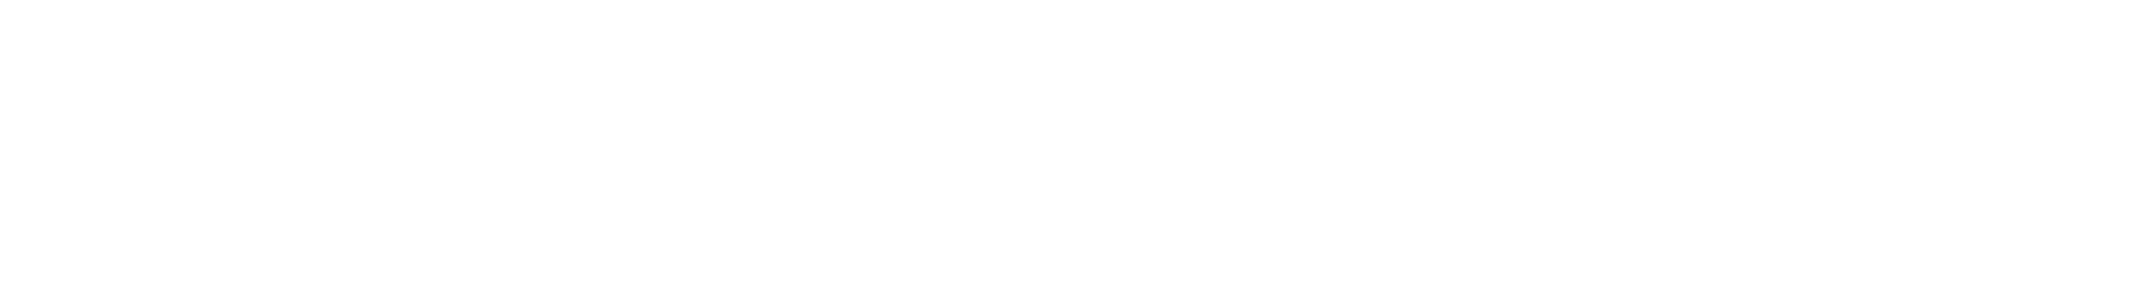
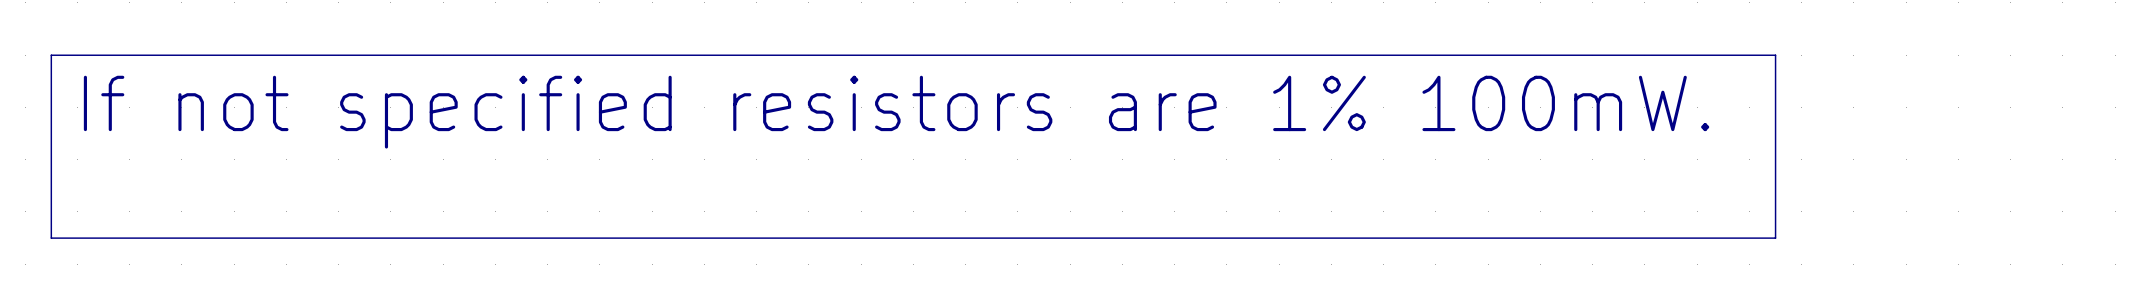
line: none -> (51, 55) (1775, 55) (1775, 238) (51, 238) (51, 55)
text: none -> If not specified resistors are 1% 100mW. (896, 112)

